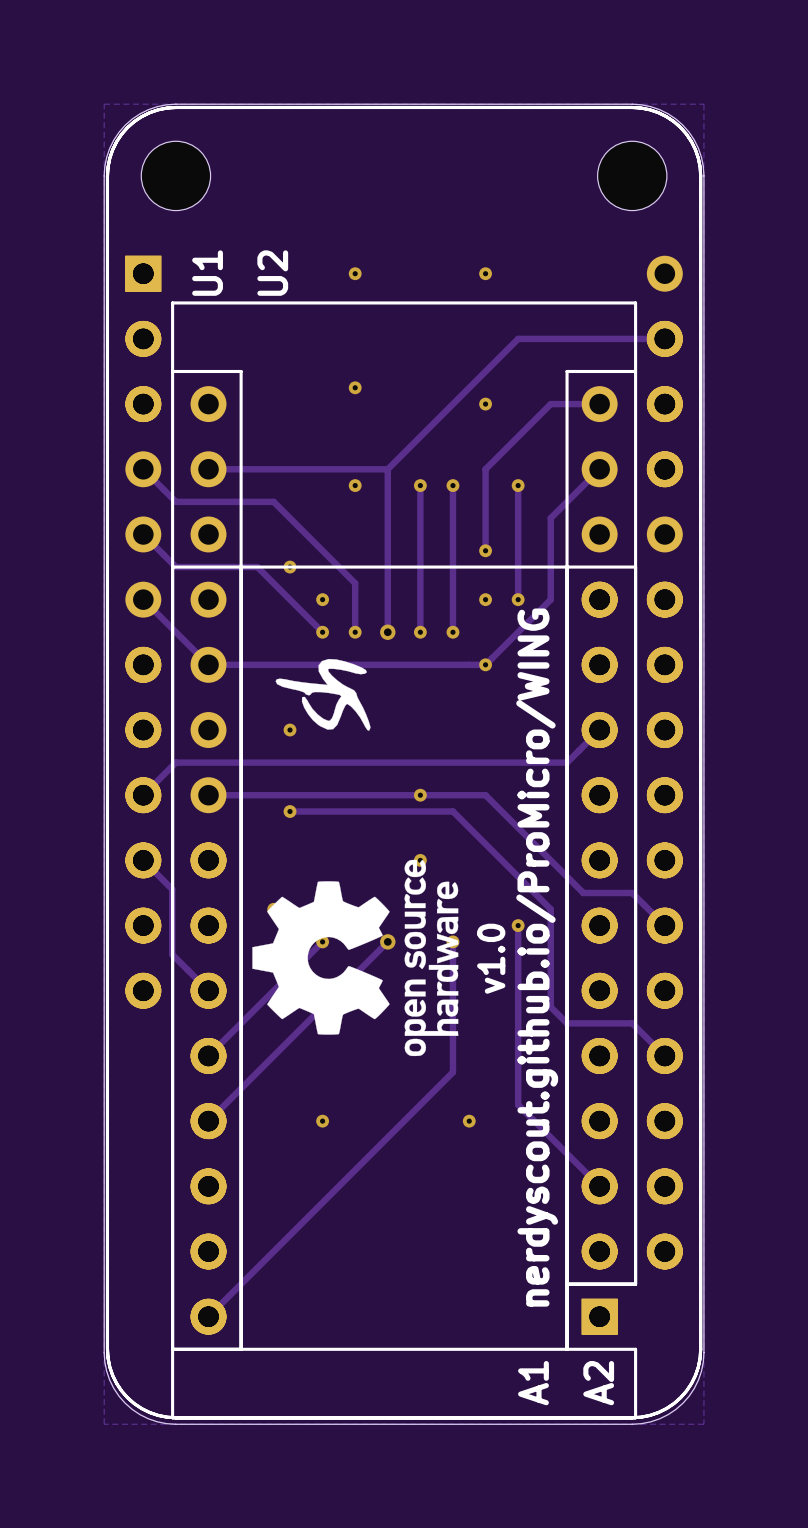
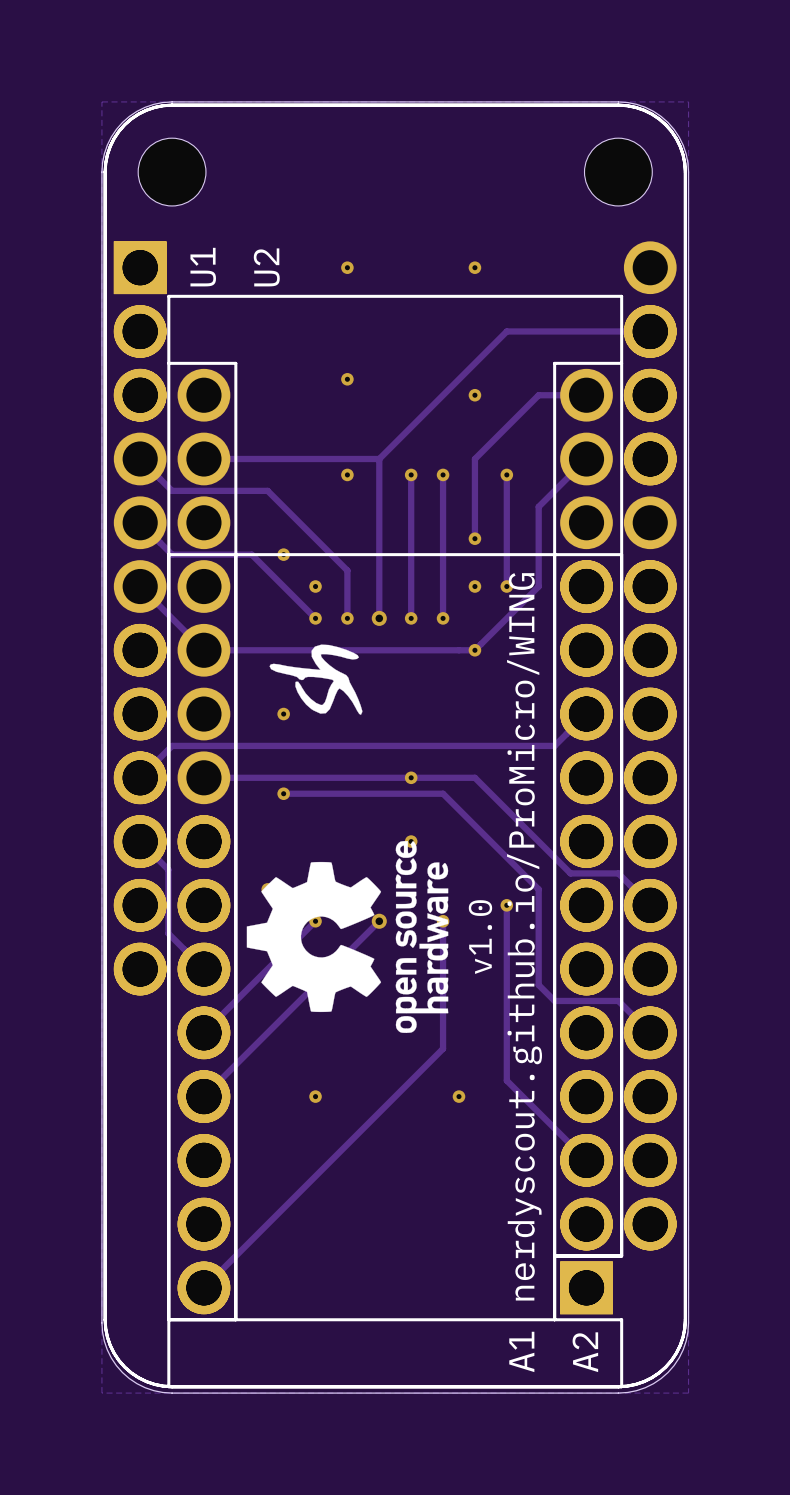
U1 footprint: [105, 105, 703, 1420] -> [103, 103, 687, 1389]
U2 footprint: [105, 105, 703, 1420] -> [103, 103, 687, 1389]
A2 footprint: [171, 301, 638, 1420] -> [167, 294, 624, 1389]
A1 footprint: [171, 565, 638, 1351] -> [167, 553, 624, 1322]

